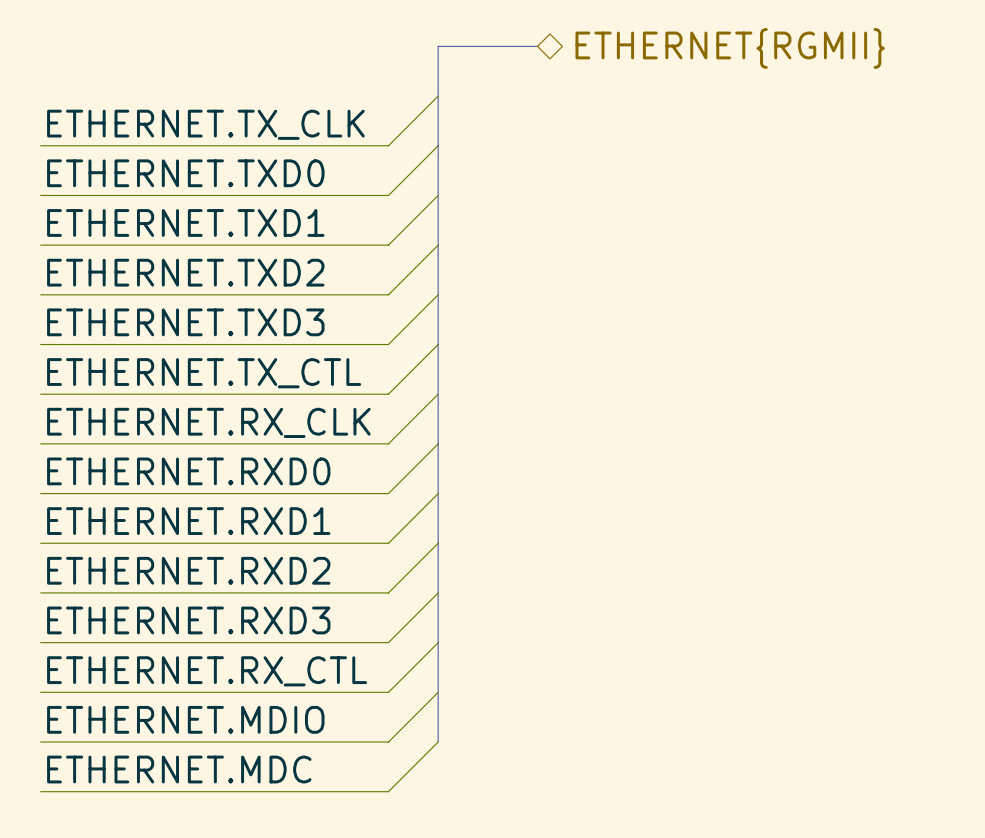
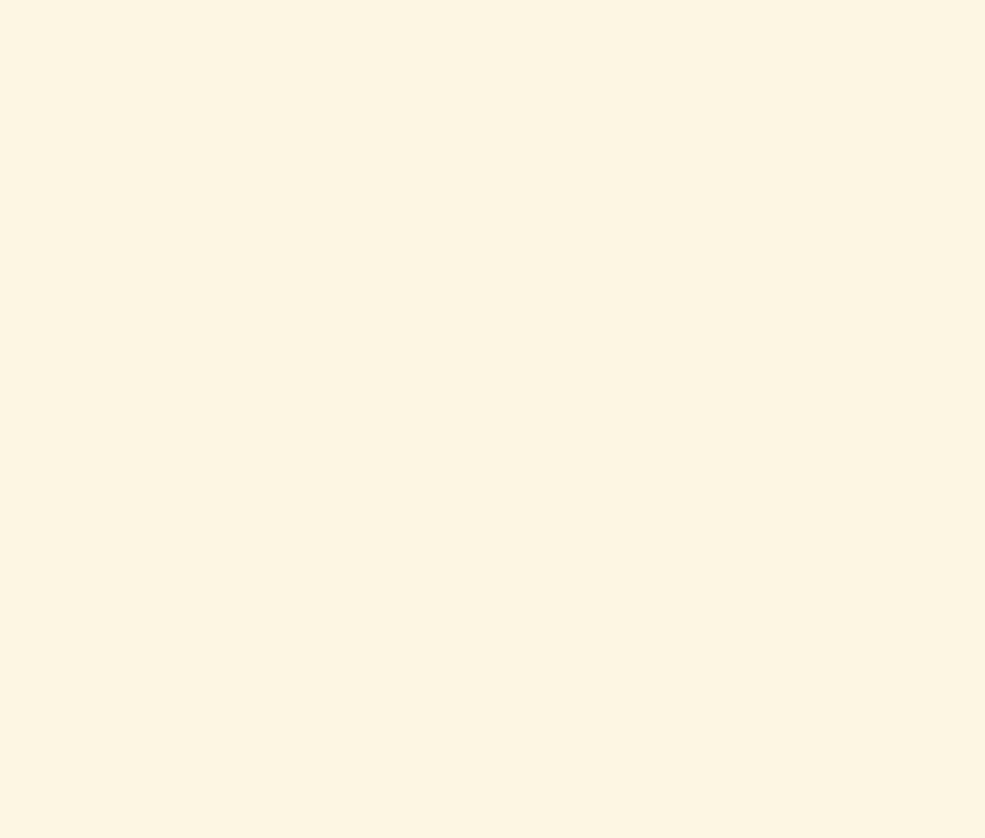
bus: (537, 46) (438, 46) (438, 742) -> none
hierarchical label: ETHERNET{RGMII} (730, 48) -> none
wire: (438, 96) (388, 145) (40, 145) -> none
label: ETHERNET.TX_CLK (205, 124) -> none
wire: (438, 145) (388, 195) (40, 195) -> none
label: ETHERNET.TXD0 (185, 173) -> none
wire: (438, 195) (388, 245) (40, 245) -> none
label: ETHERNET.TXD1 (185, 222) -> none
wire: (438, 245) (388, 294) (40, 294) -> none
label: ETHERNET.TXD2 (185, 272) -> none
wire: (438, 294) (388, 344) (40, 344) -> none
label: ETHERNET.TXD3 (185, 322) -> none
wire: (438, 344) (388, 394) (40, 394) -> none
label: ETHERNET.TX_CTL (204, 373) -> none
wire: (438, 394) (388, 443) (40, 443) -> none
label: ETHERNET.RX_CLK (208, 422) -> none
wire: (438, 443) (388, 493) (40, 493) -> none
label: ETHERNET.RXD0 (188, 471) -> none
wire: (438, 493) (388, 543) (40, 543) -> none
label: ETHERNET.RXD1 (188, 521) -> none
wire: (438, 543) (388, 592) (40, 592) -> none
label: ETHERNET.RXD2 (188, 570) -> none
wire: (438, 592) (388, 642) (40, 642) -> none
label: ETHERNET.RXD3 (188, 620) -> none
wire: (438, 642) (388, 692) (40, 692) -> none
label: ETHERNET.RX_CTL (207, 671) -> none
wire: (438, 692) (388, 742) (40, 742) -> none
label: ETHERNET.MDIO (185, 719) -> none
wire: (438, 742) (388, 791) (40, 791) -> none
label: ETHERNET.MDC (179, 769) -> none

